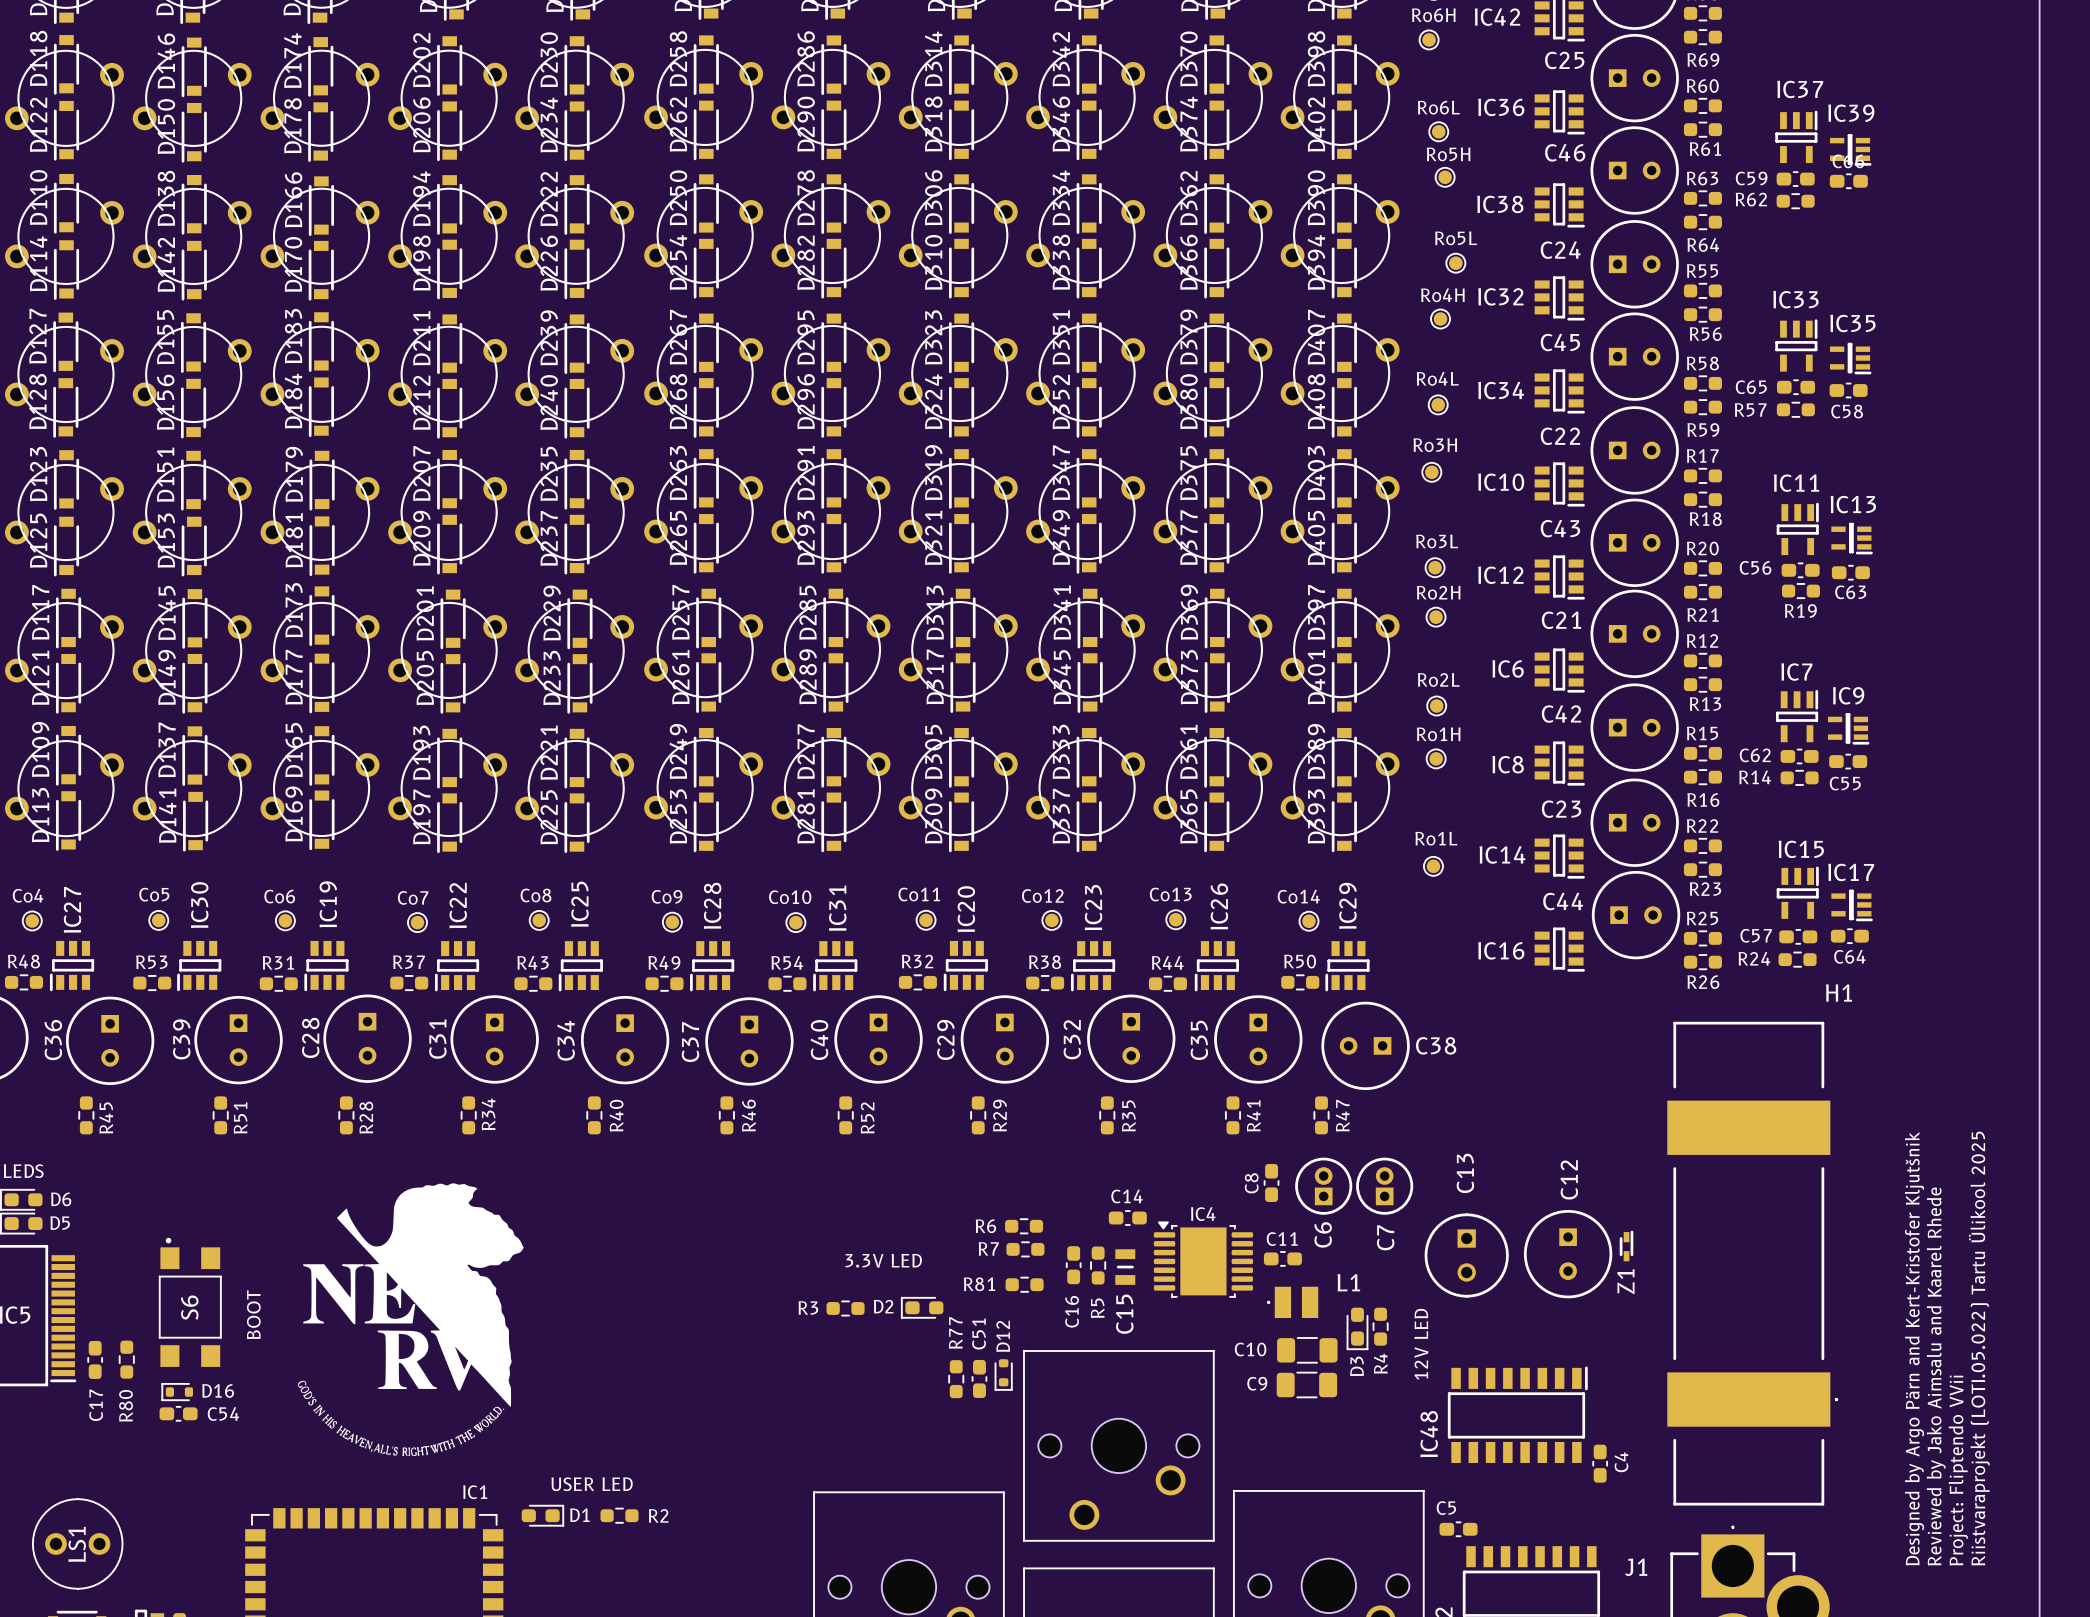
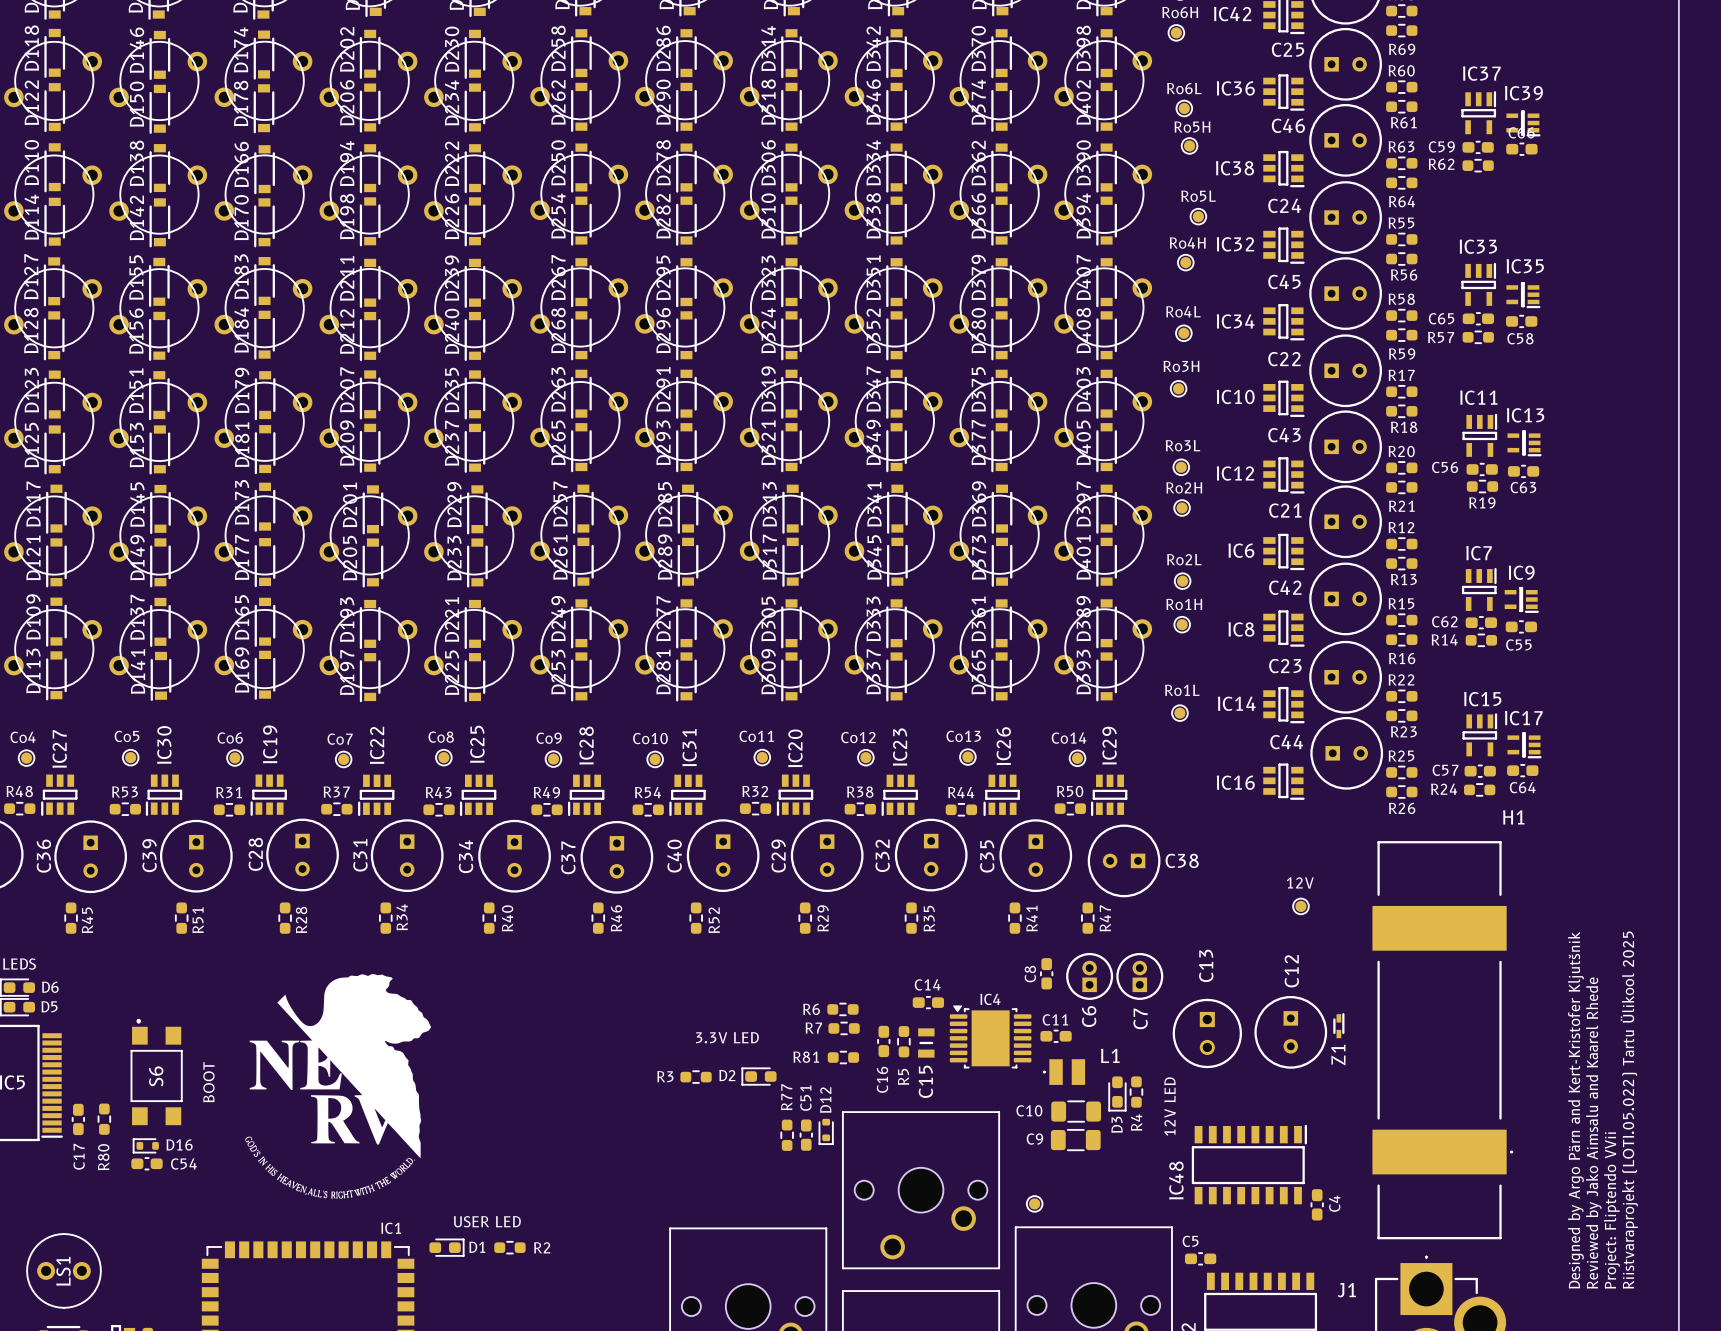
text: none -> 12V (1300, 882)
part: none -> (1300, 906)
part: none -> (1034, 1203)

